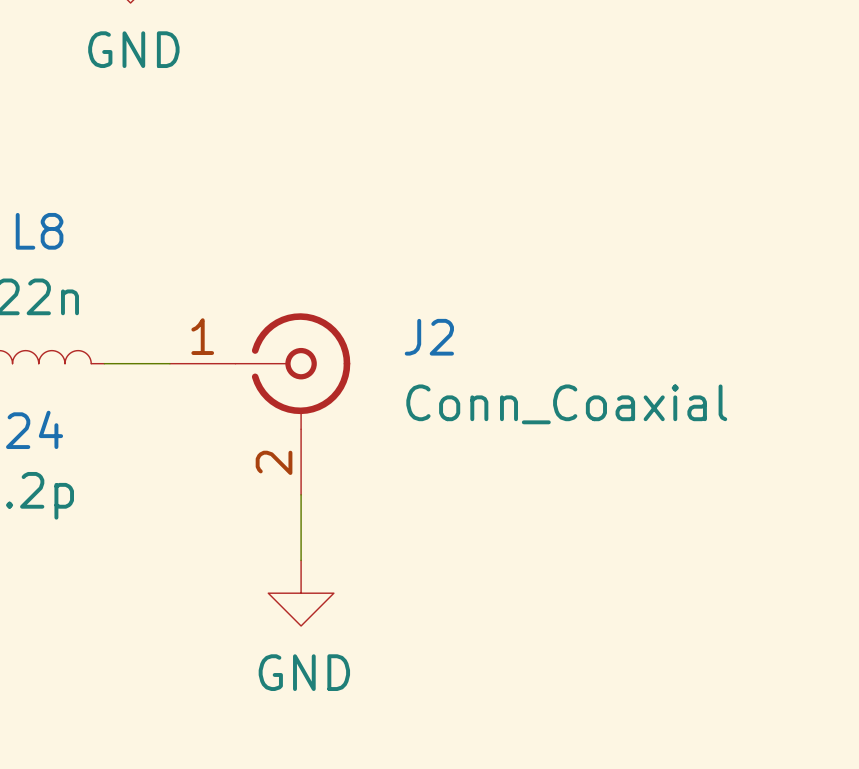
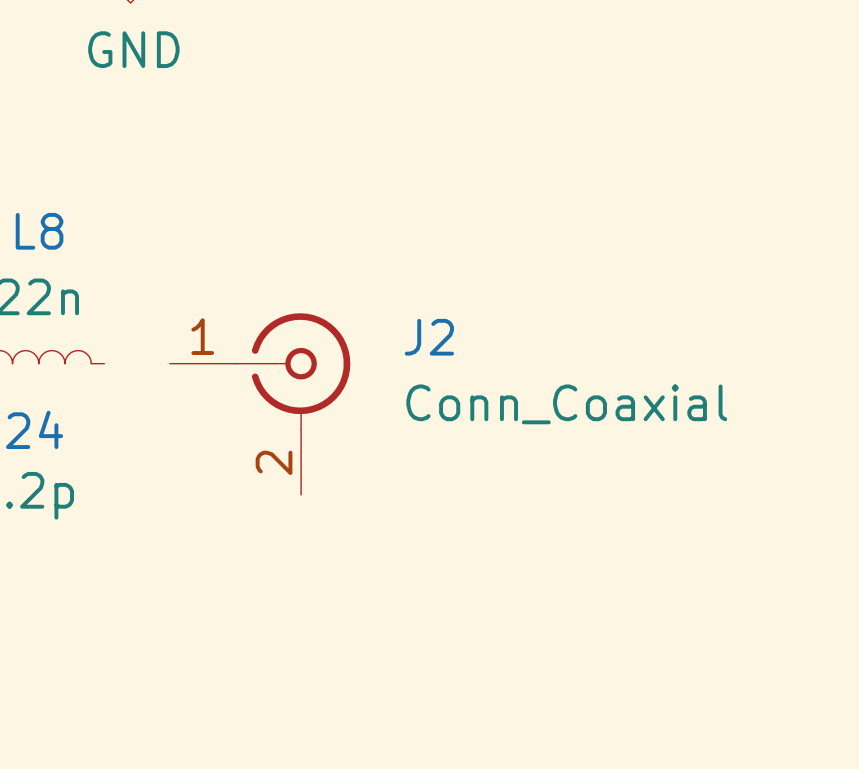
wire: (104, 363) (169, 363) -> none
wire: (301, 494) (301, 560) -> none
power symbol: GND (301, 593) -> none

